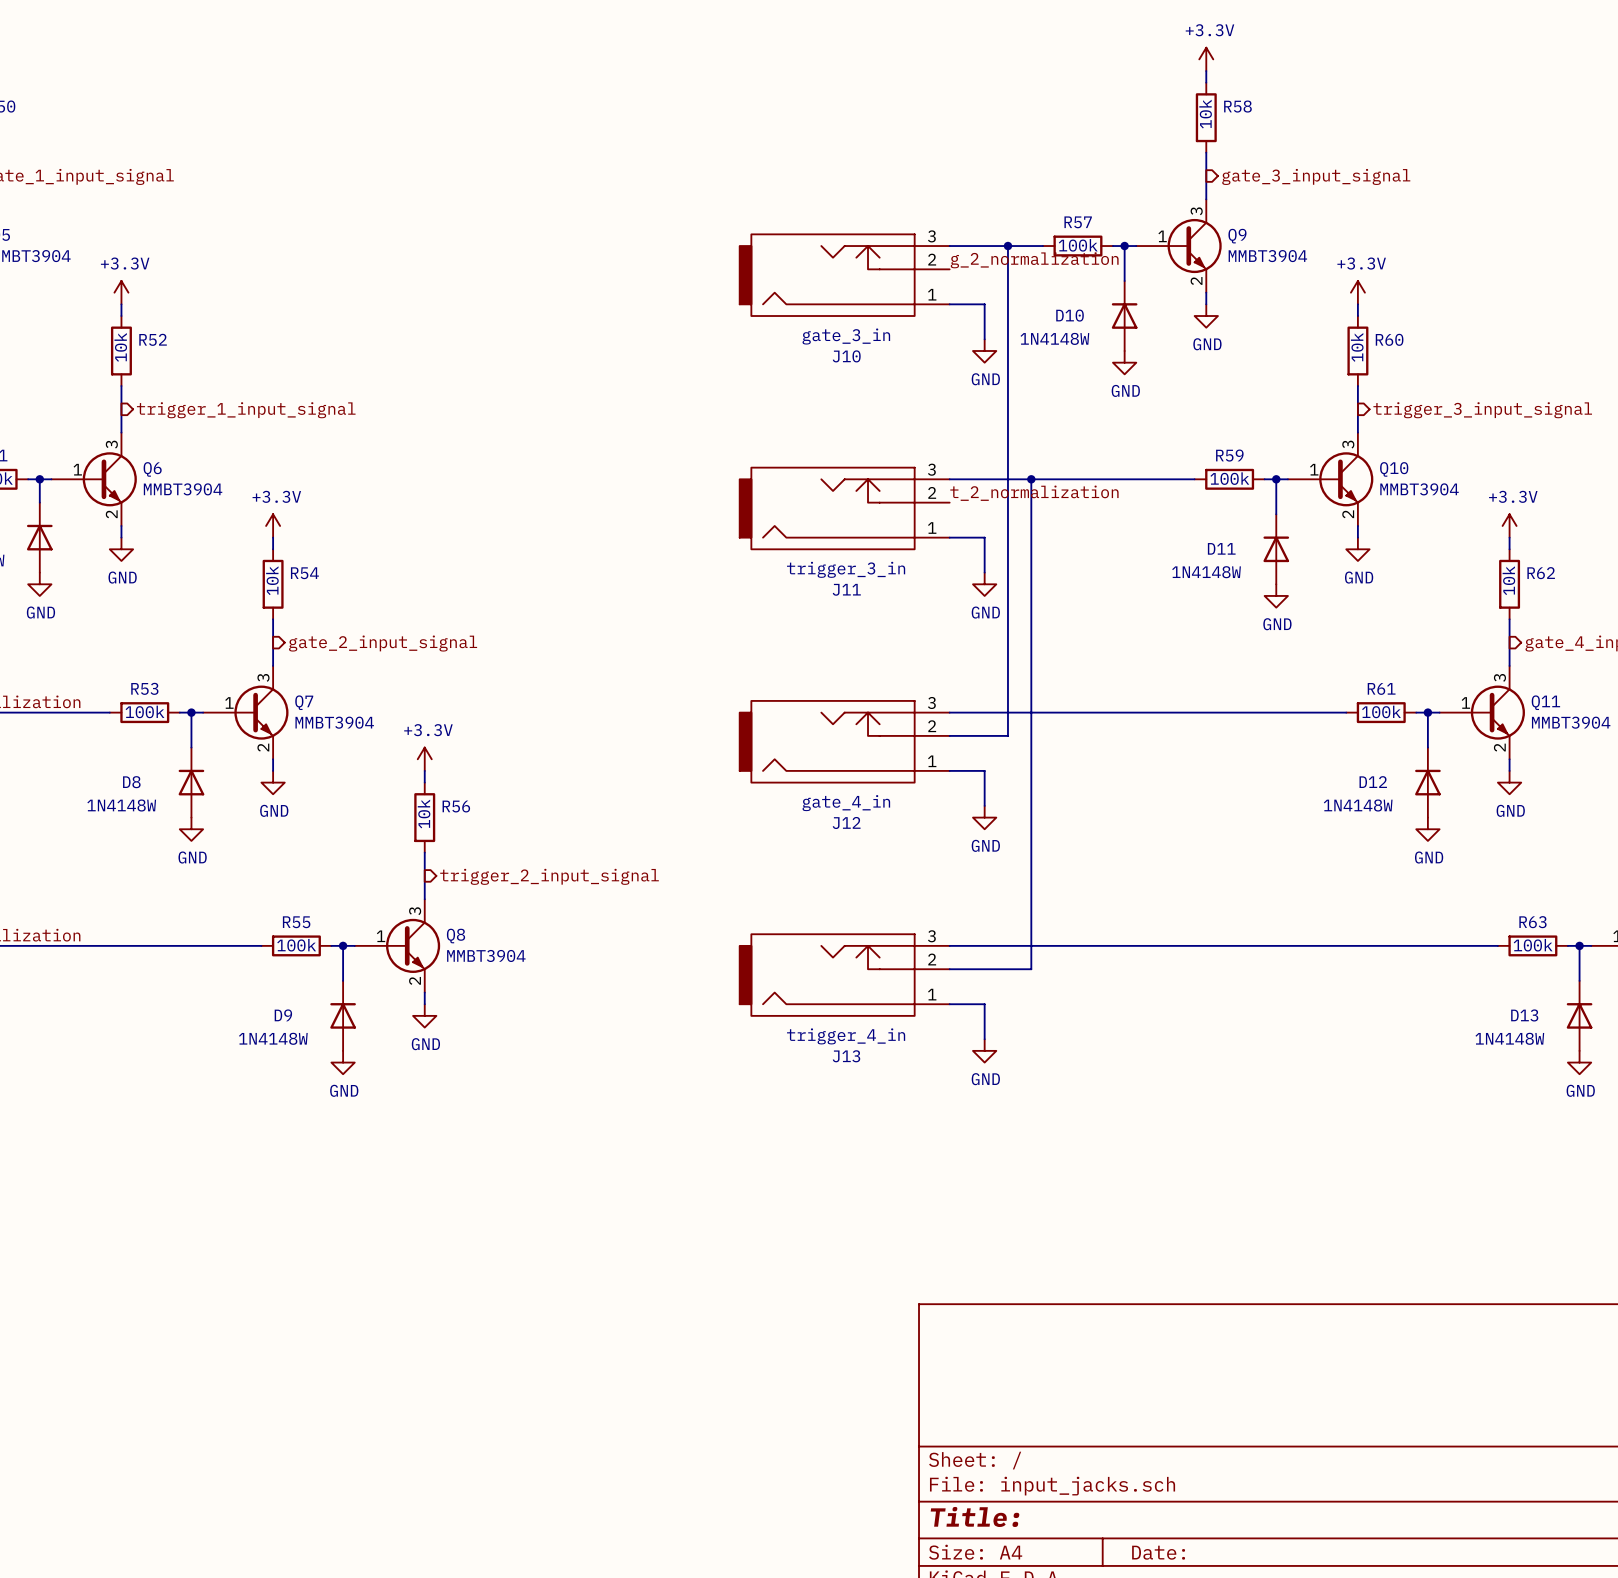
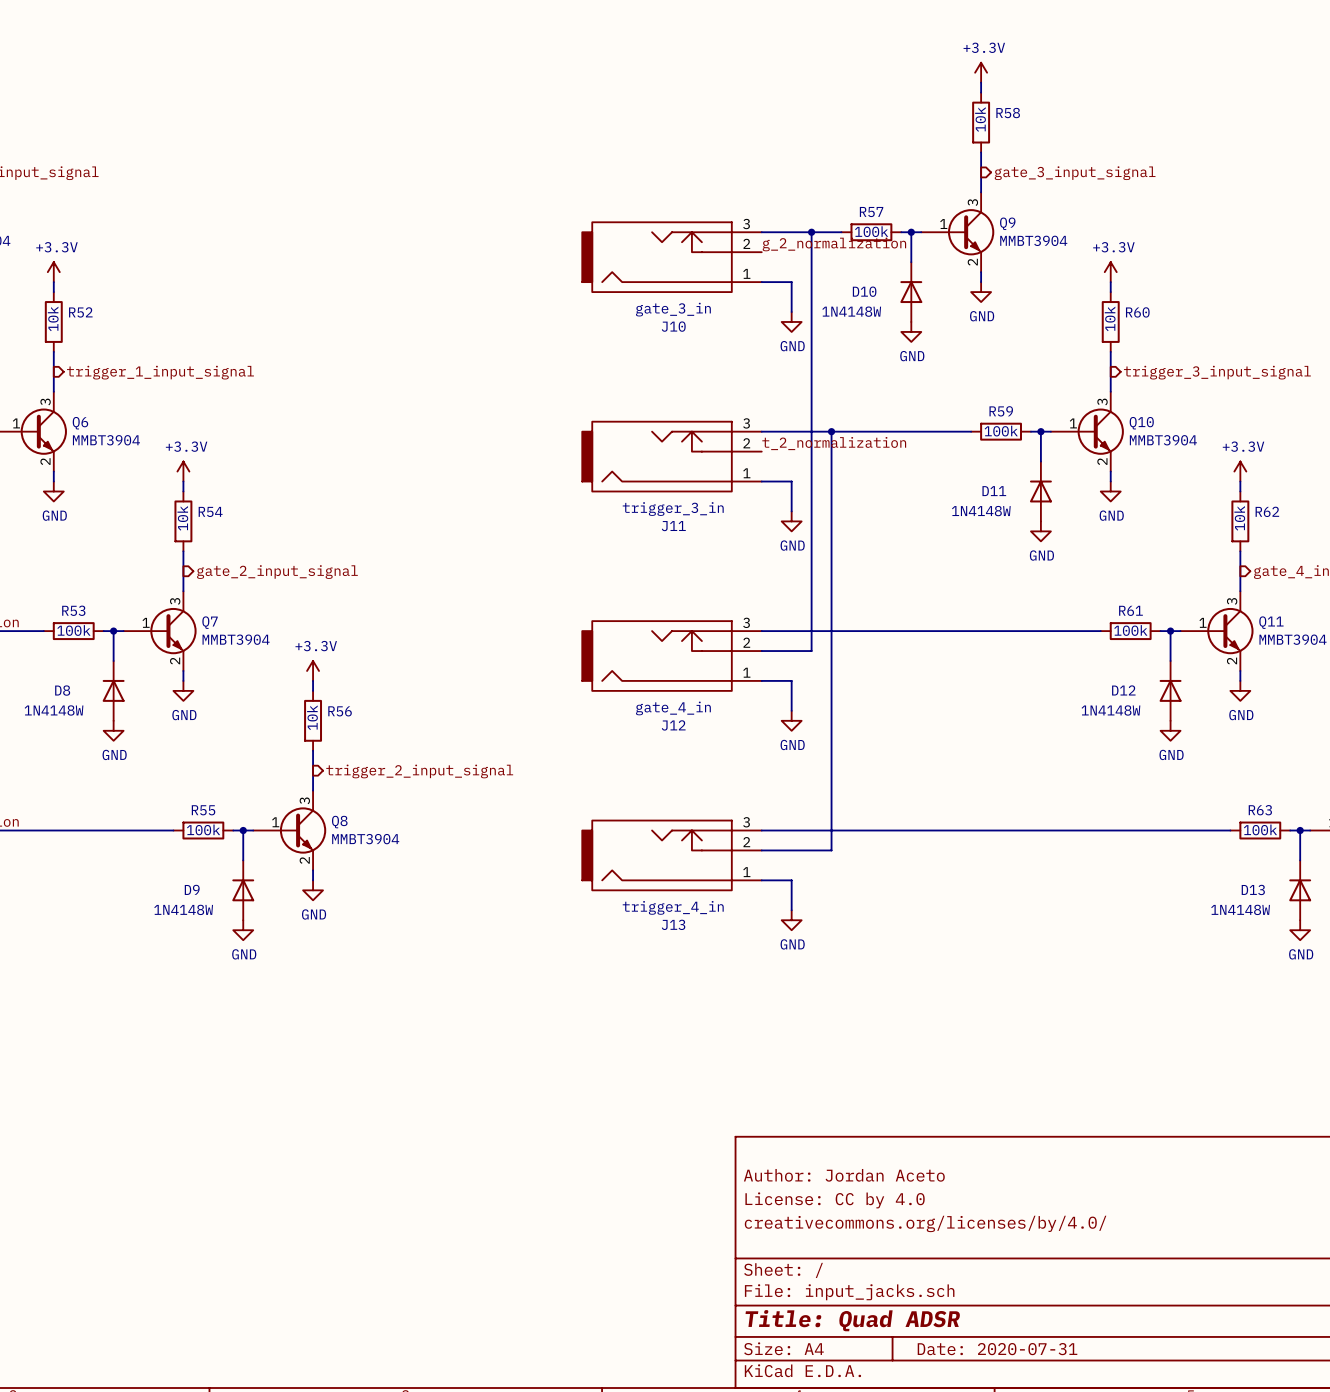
title block: none -> Author: Jordan Aceto (844, 1175)
title block: none -> License: CC by 4.0 (835, 1200)
title block: none -> creativecommons.org/licenses/by/4.0/ (925, 1223)
title block: Title: (975, 1516) -> Title: Quad ADSR (852, 1320)
title block: Date: (1158, 1552) -> Date: 2020-07-31 (997, 1349)

